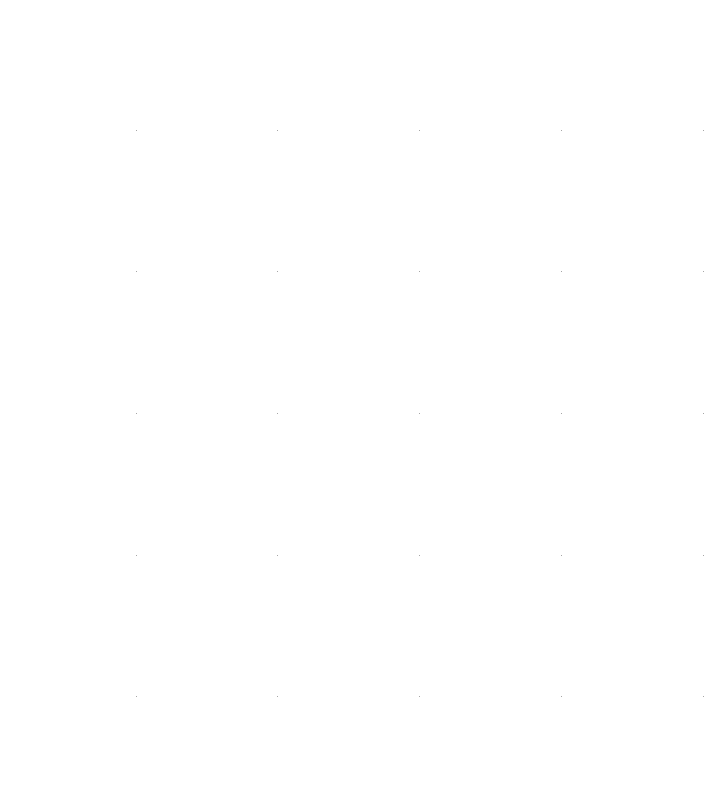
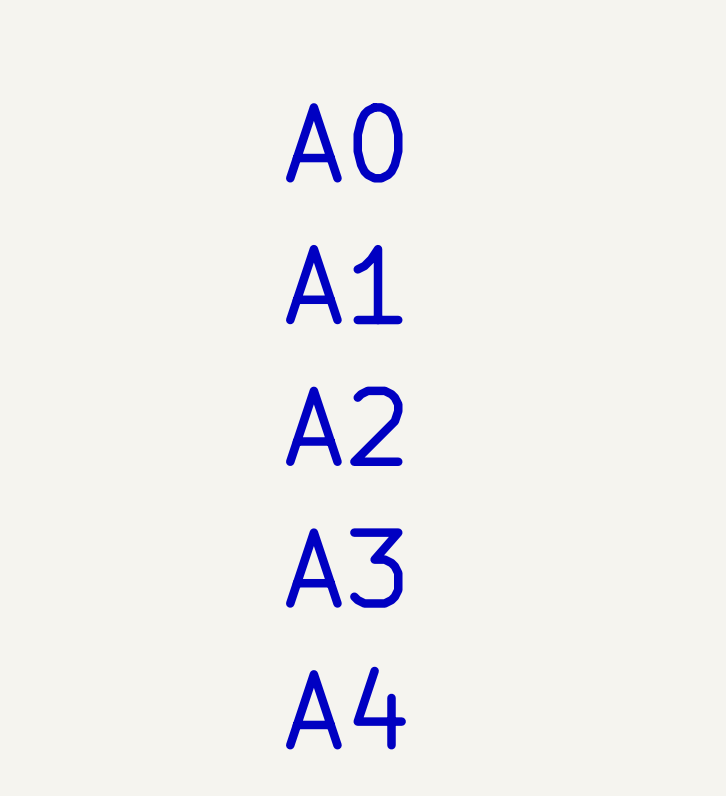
text: none -> A0 (344, 142)
text: none -> A1 (344, 284)
text: none -> A2 (344, 426)
text: none -> A3 (344, 568)
text: none -> A4 (345, 708)

